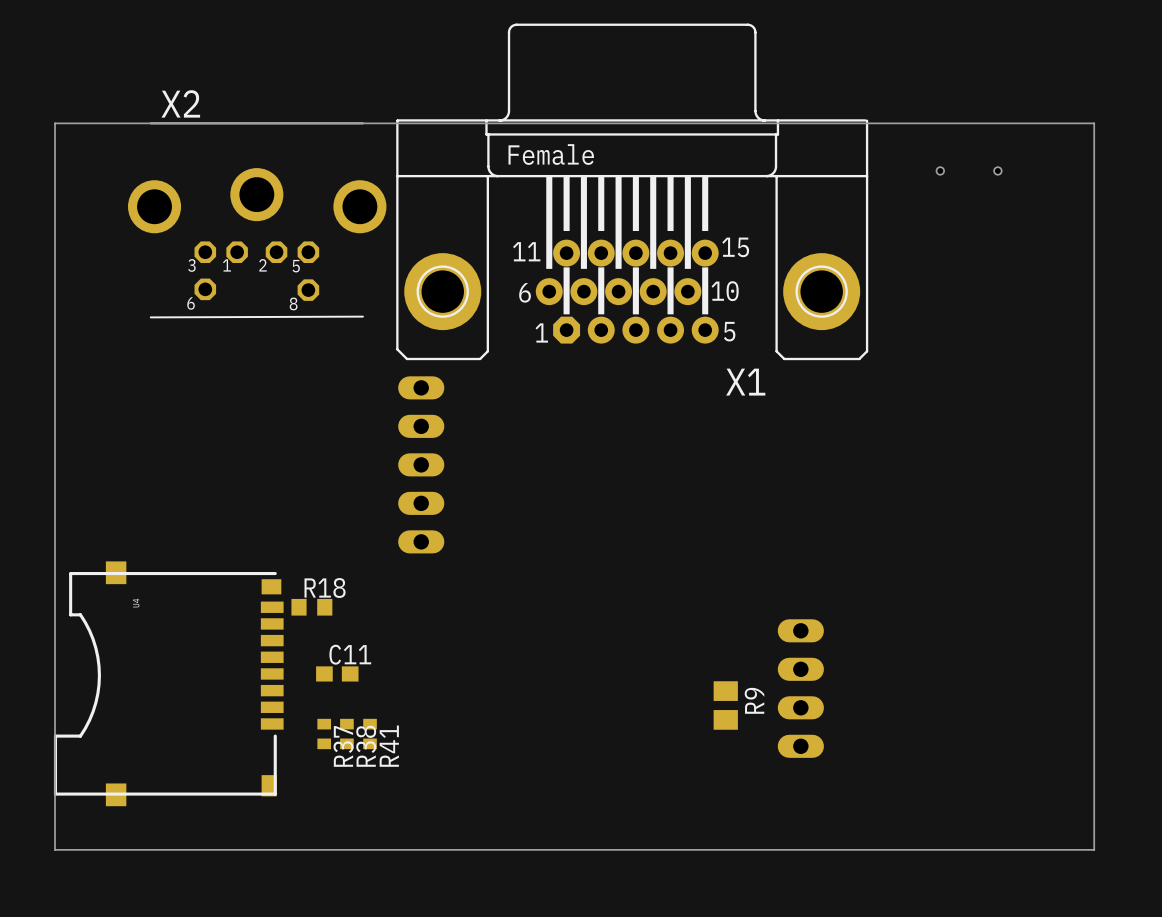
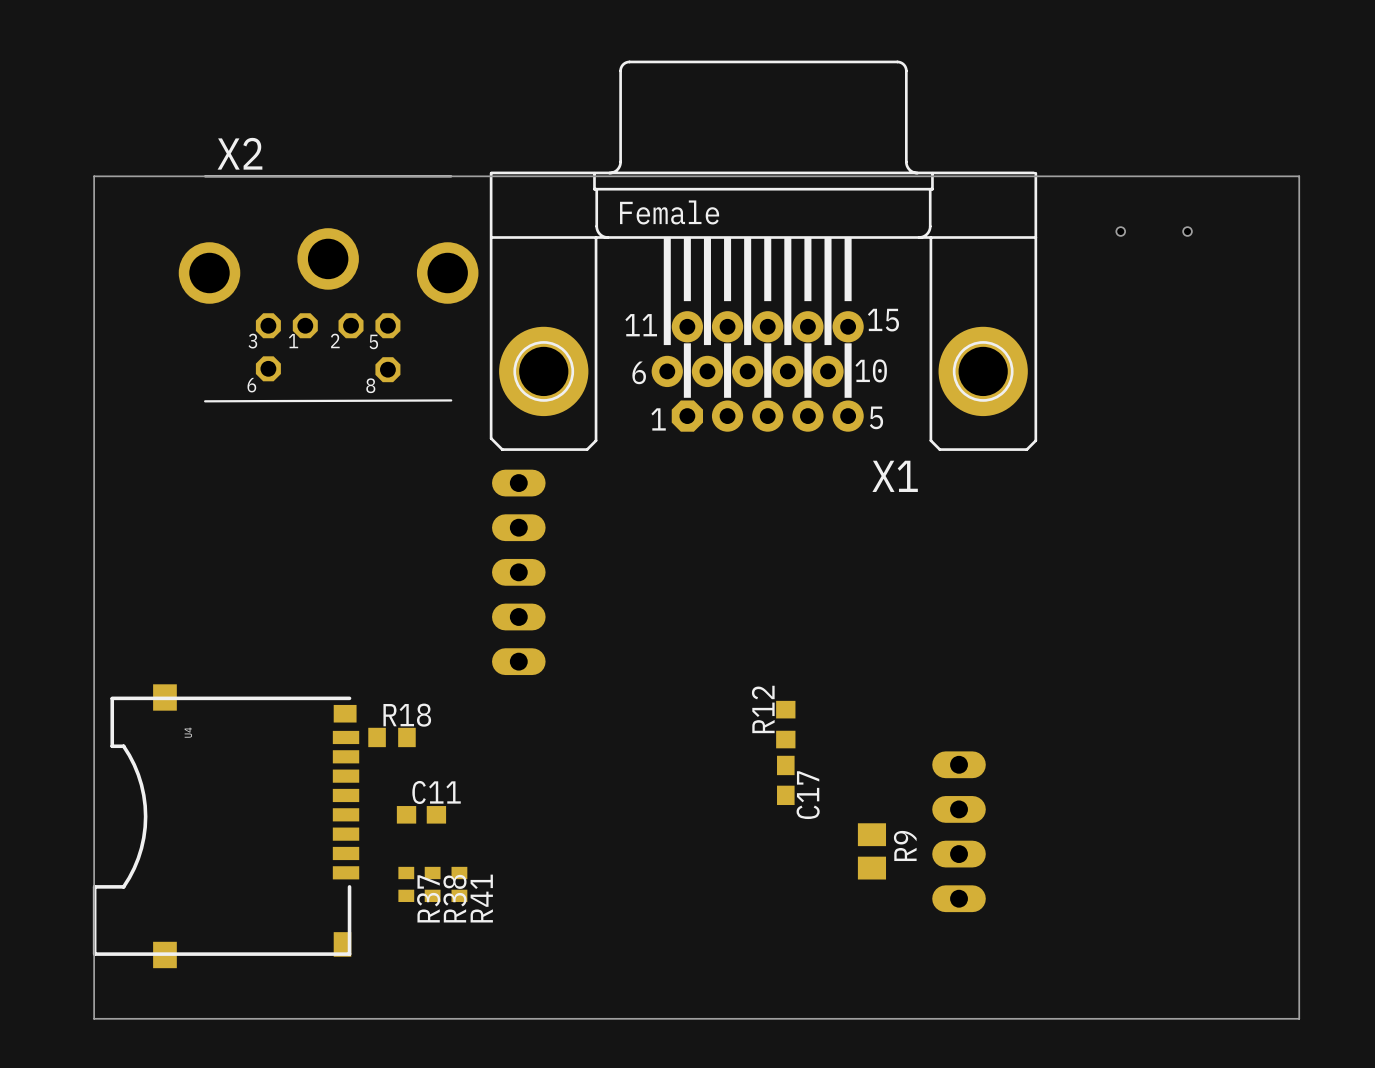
R12: none -> (785, 724)
C17: none -> (785, 780)

